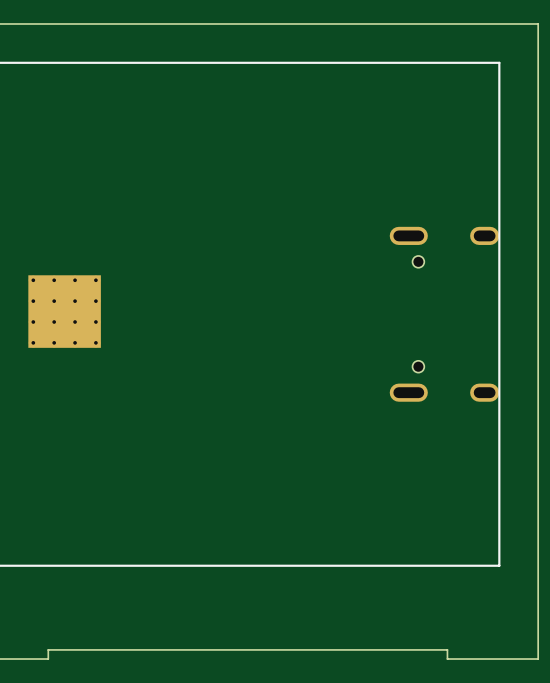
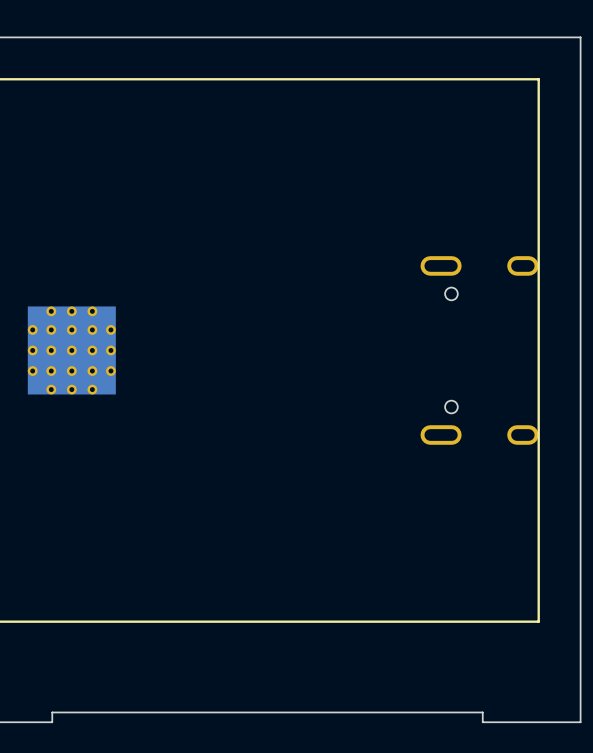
part footprint: [28, 275, 101, 348] -> [27, 306, 116, 395]

